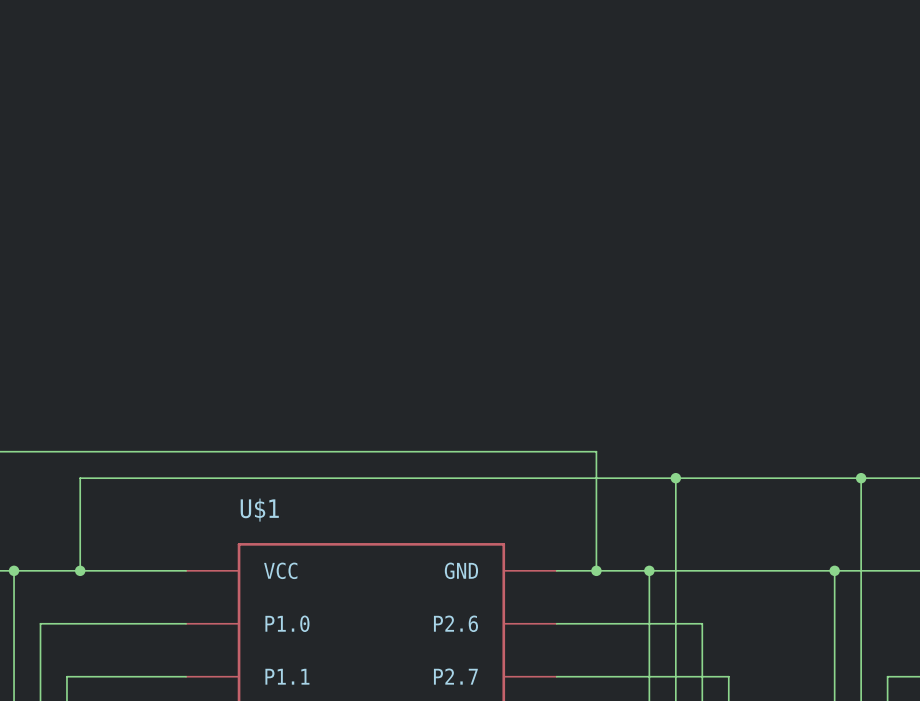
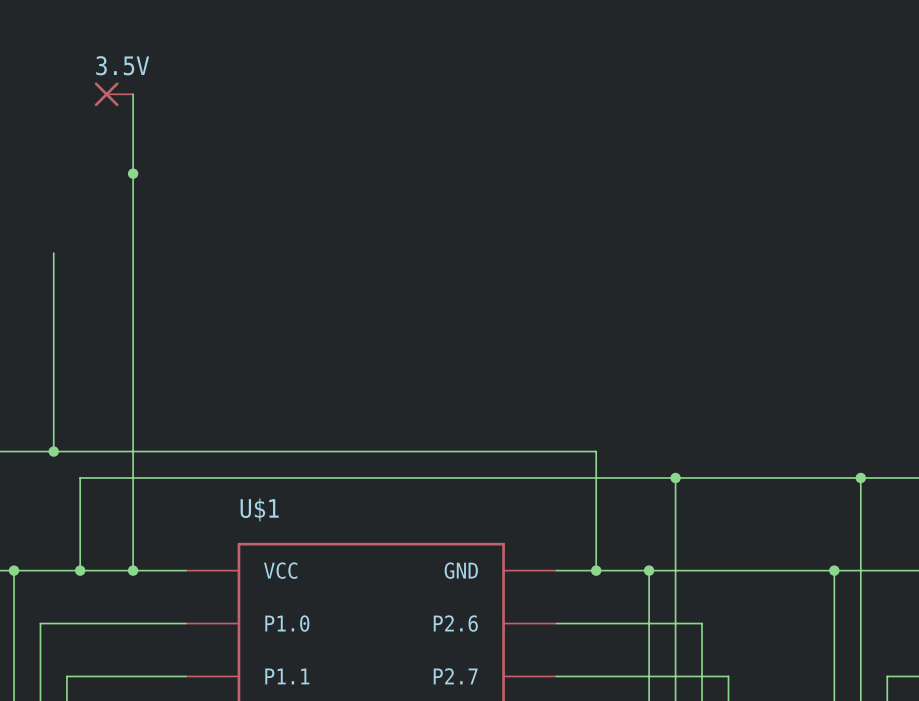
3.5V: none -> (113, 94)
wire: none -> (133, 94) (133, 570)
junction: none -> (133, 173)
wire: none -> (53, 253) (53, 451)
junction: none -> (53, 451)
junction: none -> (133, 570)

